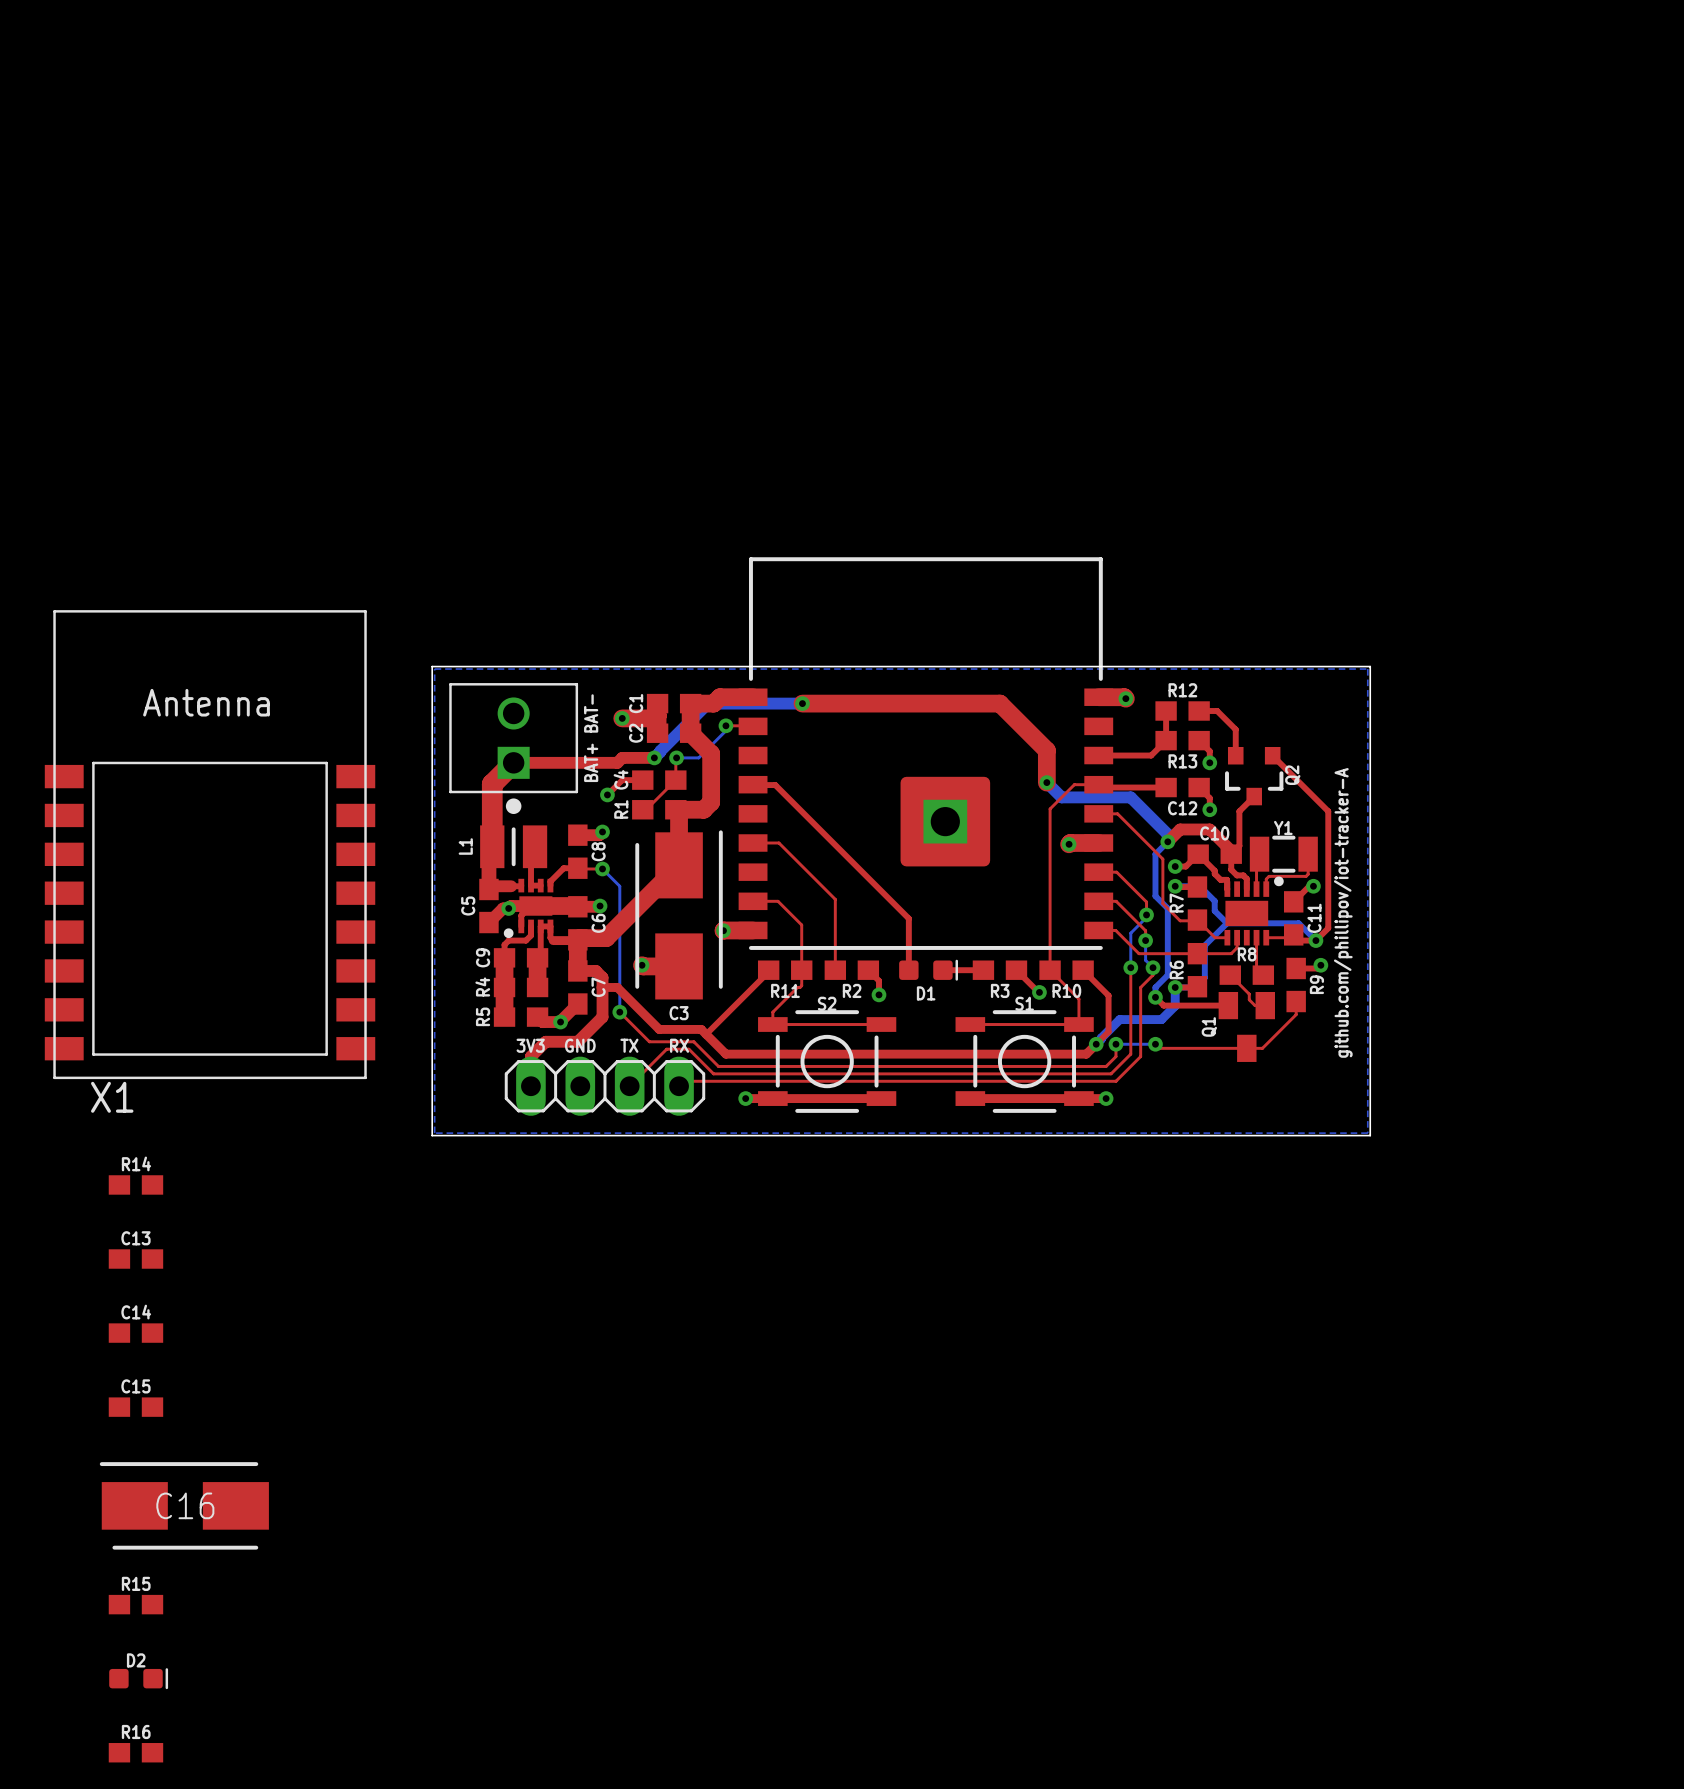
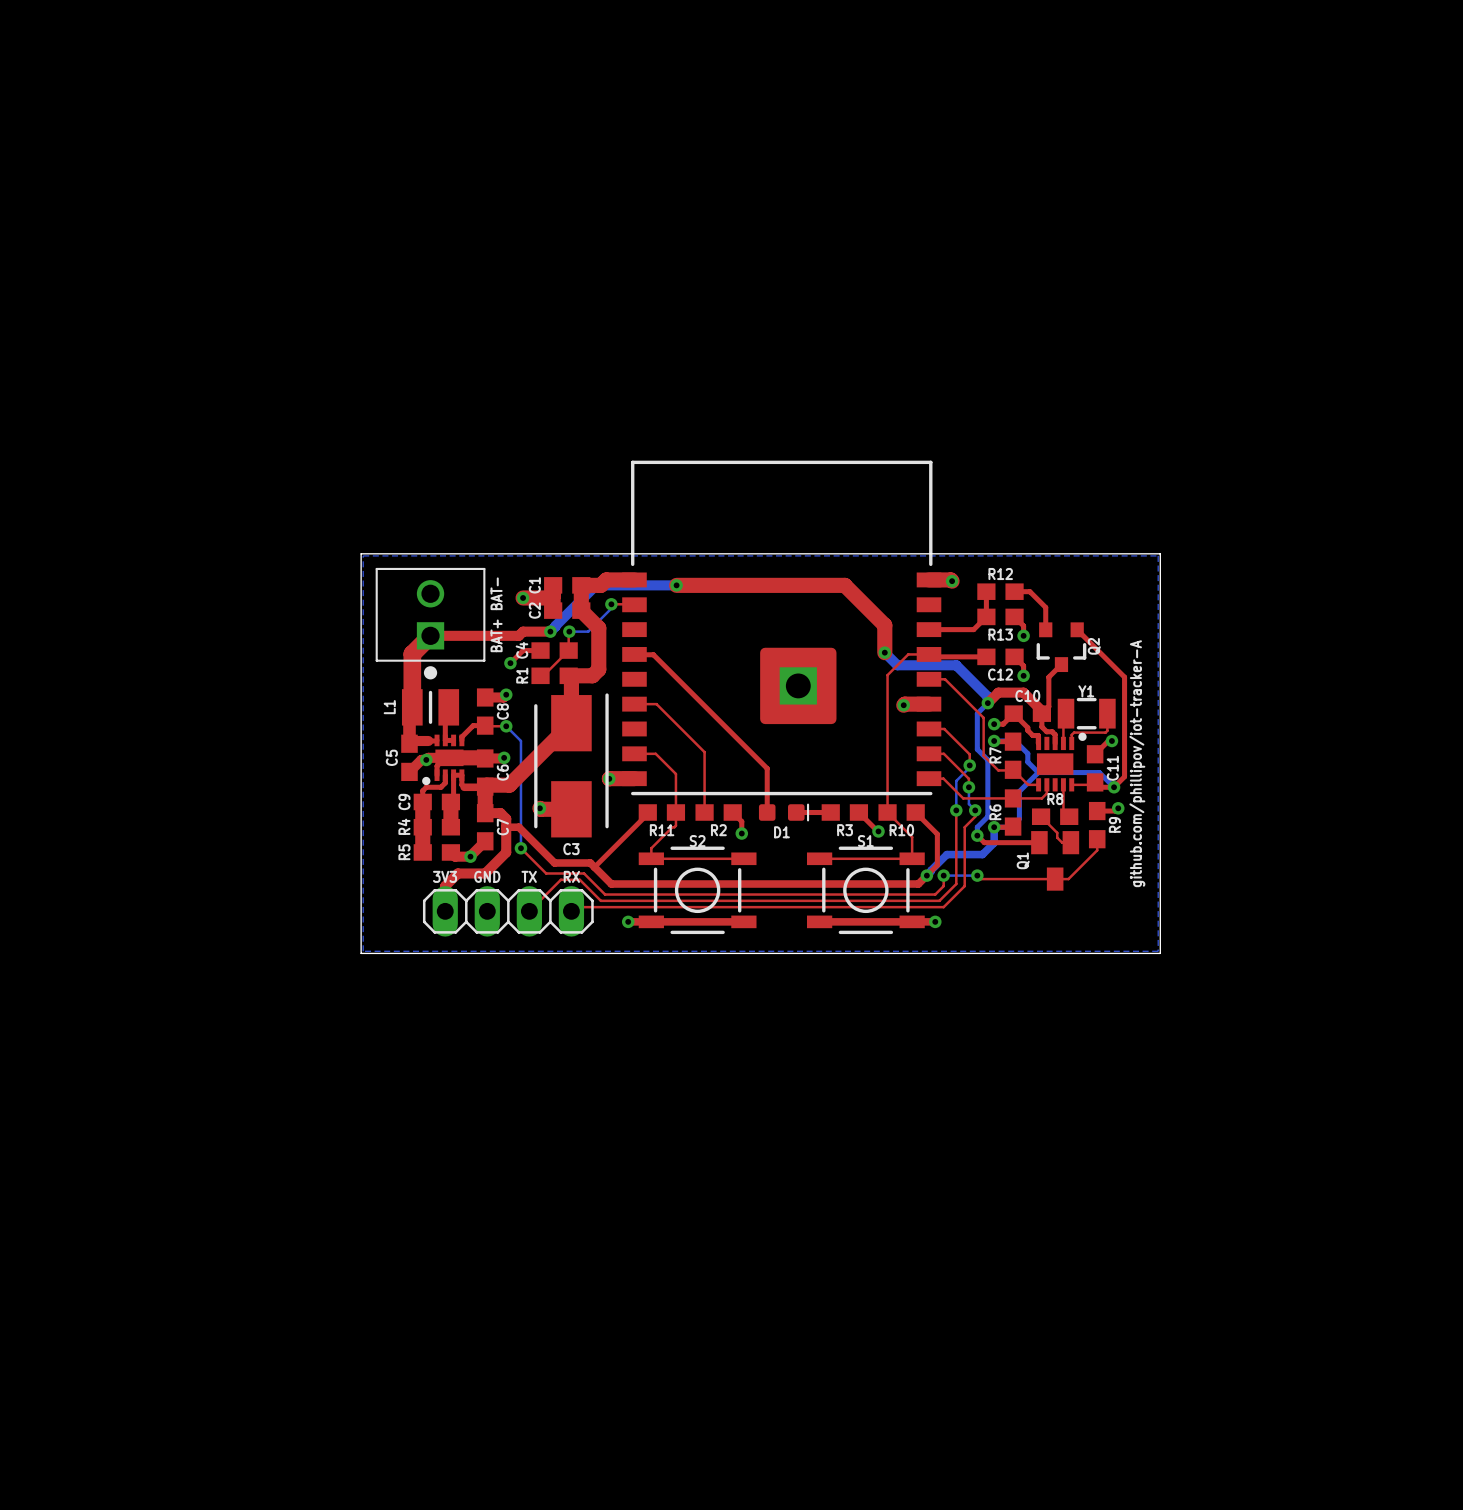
X1: (210, 844) -> none
R14: (135, 1184) -> none
C13: (135, 1259) -> none
C14: (135, 1333) -> none
C15: (135, 1407) -> none
C16: (184, 1505) -> none
R15: (135, 1604) -> none
D2: (138, 1678) -> none
R16: (135, 1752) -> none

